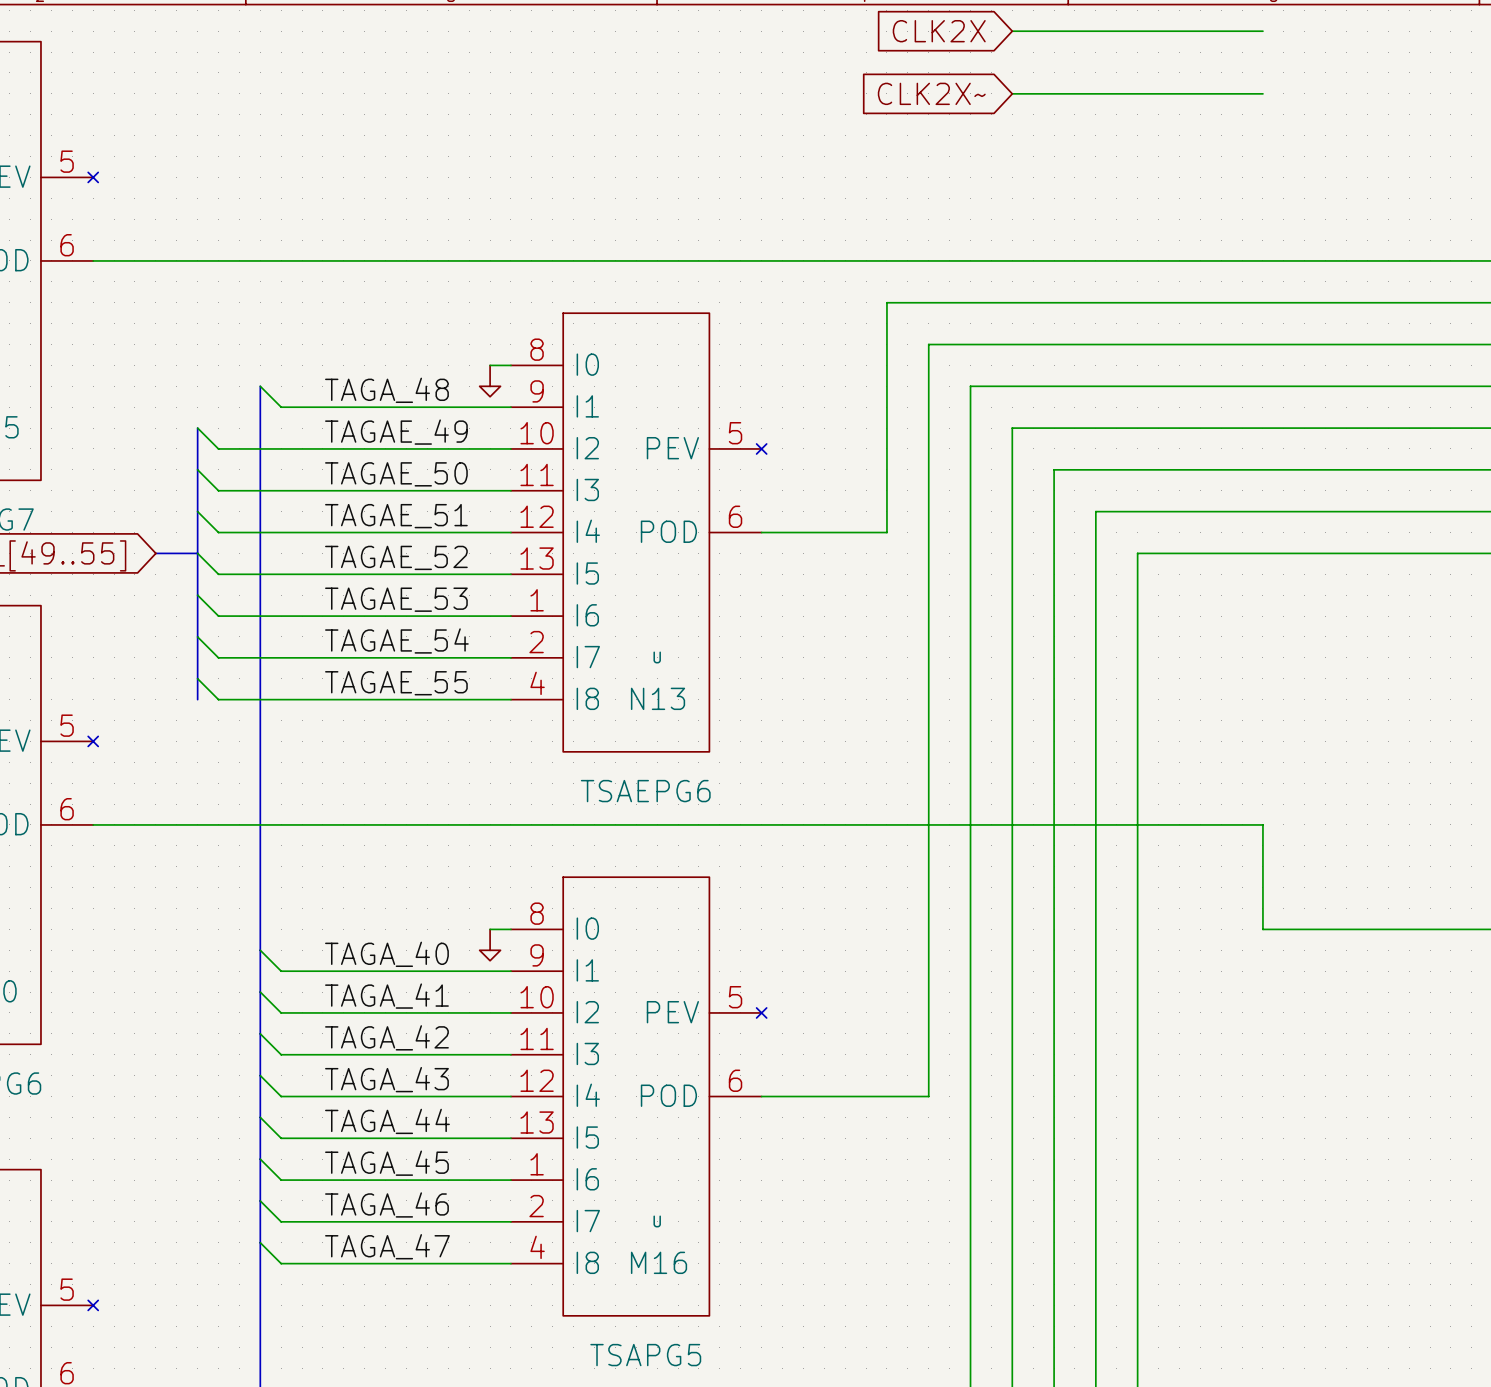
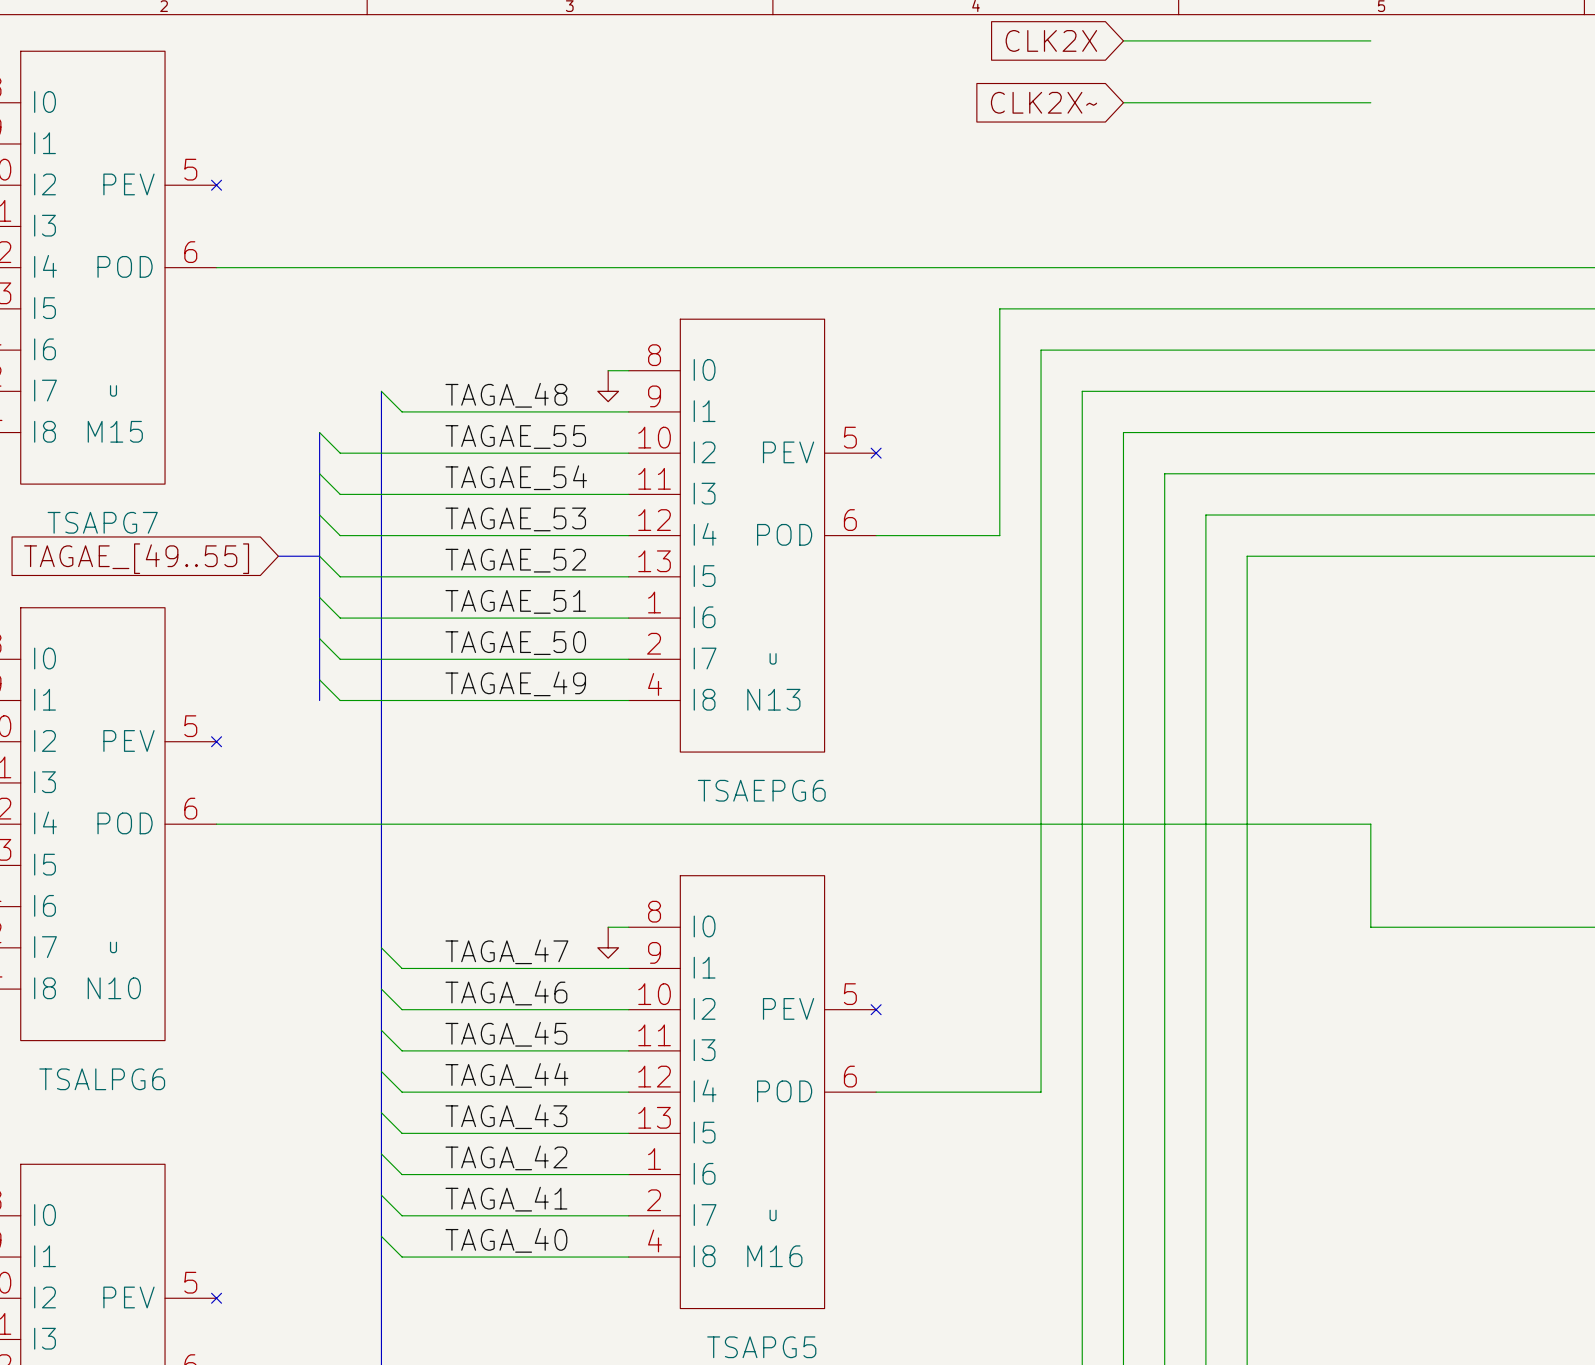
label: TAGAE_49 (396, 432) -> TAGAE_55 (515, 436)
label: TAGAE_50 (396, 474) -> TAGAE_54 (516, 477)
label: TAGAE_51 (396, 516) -> TAGAE_53 (515, 519)
label: TAGAE_53 (396, 599) -> TAGAE_51 (515, 601)
label: TAGAE_54 (396, 640) -> TAGAE_50 (515, 643)
label: TAGAE_55 (396, 683) -> TAGAE_49 (515, 683)
label: TAGA_40 (386, 954) -> TAGA_47 (506, 951)
label: TAGA_41 (386, 996) -> TAGA_46 (506, 993)
label: TAGA_42 (386, 1037) -> TAGA_45 (506, 1034)
label: TAGA_43 (386, 1079) -> TAGA_44 (506, 1075)
label: TAGA_44 (387, 1121) -> TAGA_43 (506, 1116)
label: TAGA_45 (386, 1163) -> TAGA_42 (506, 1157)
label: TAGA_46 (386, 1204) -> TAGA_41 (506, 1199)
label: TAGA_47 (387, 1246) -> TAGA_40 (506, 1240)

